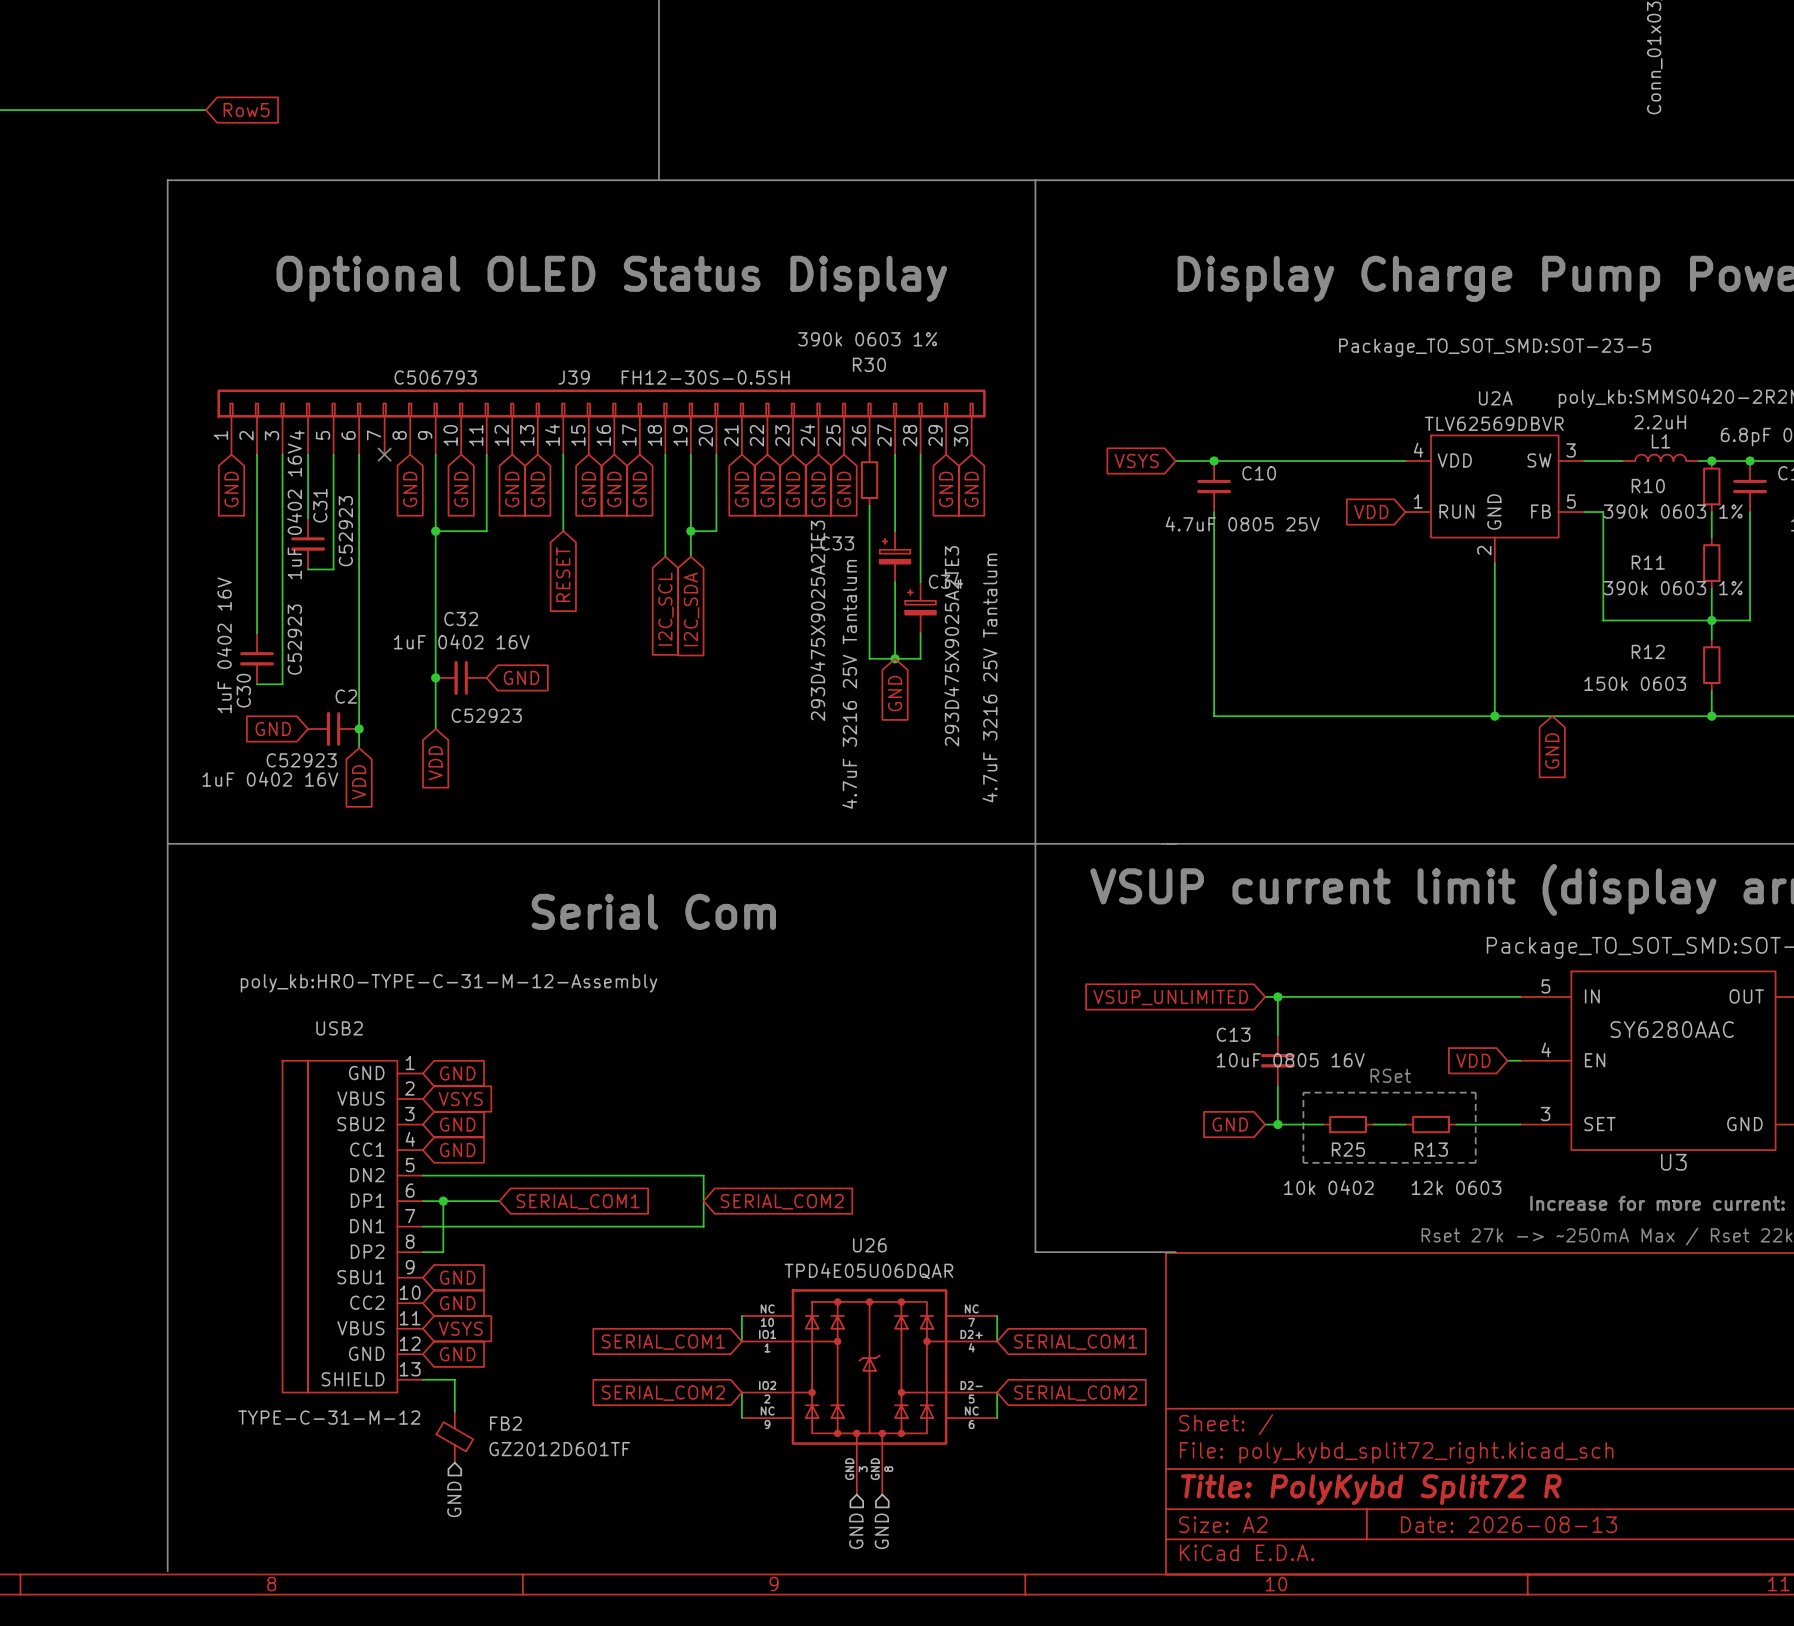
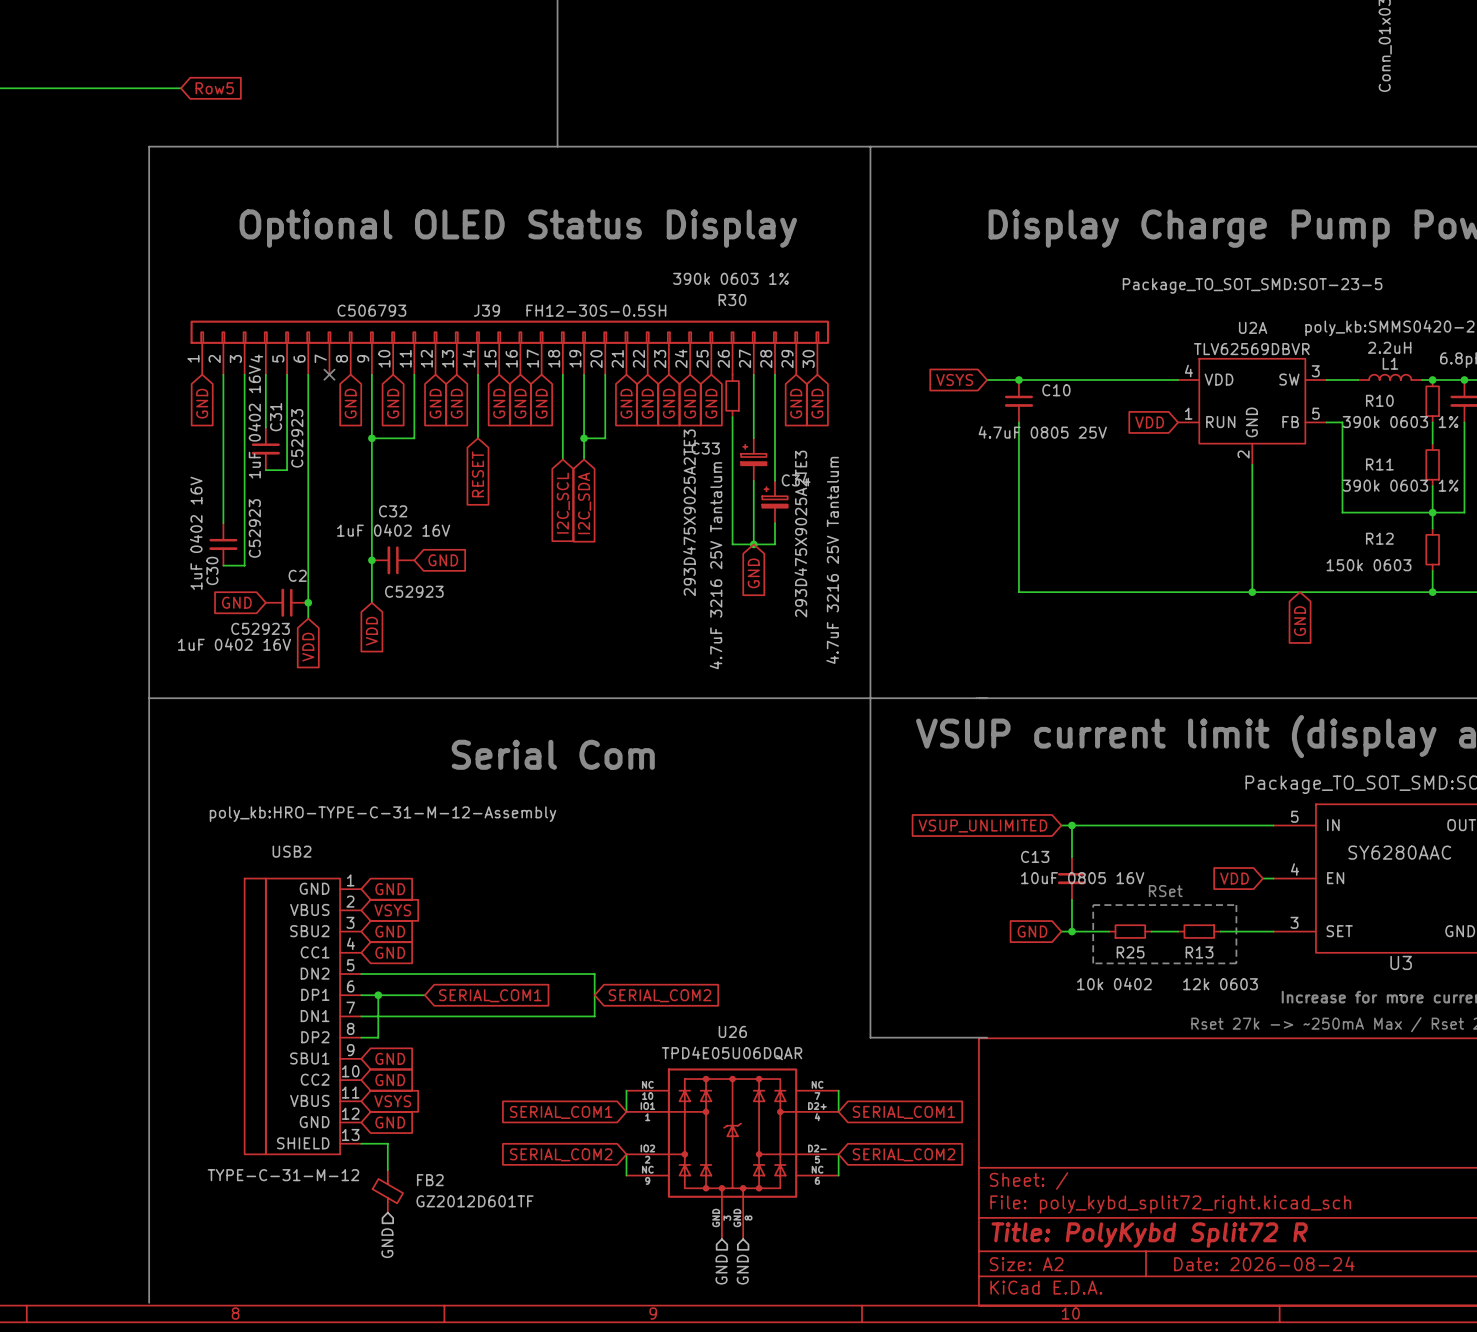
title block: Date: 2026-08-13 (1508, 1524) -> Date: 2026-08-24 (1264, 1263)

